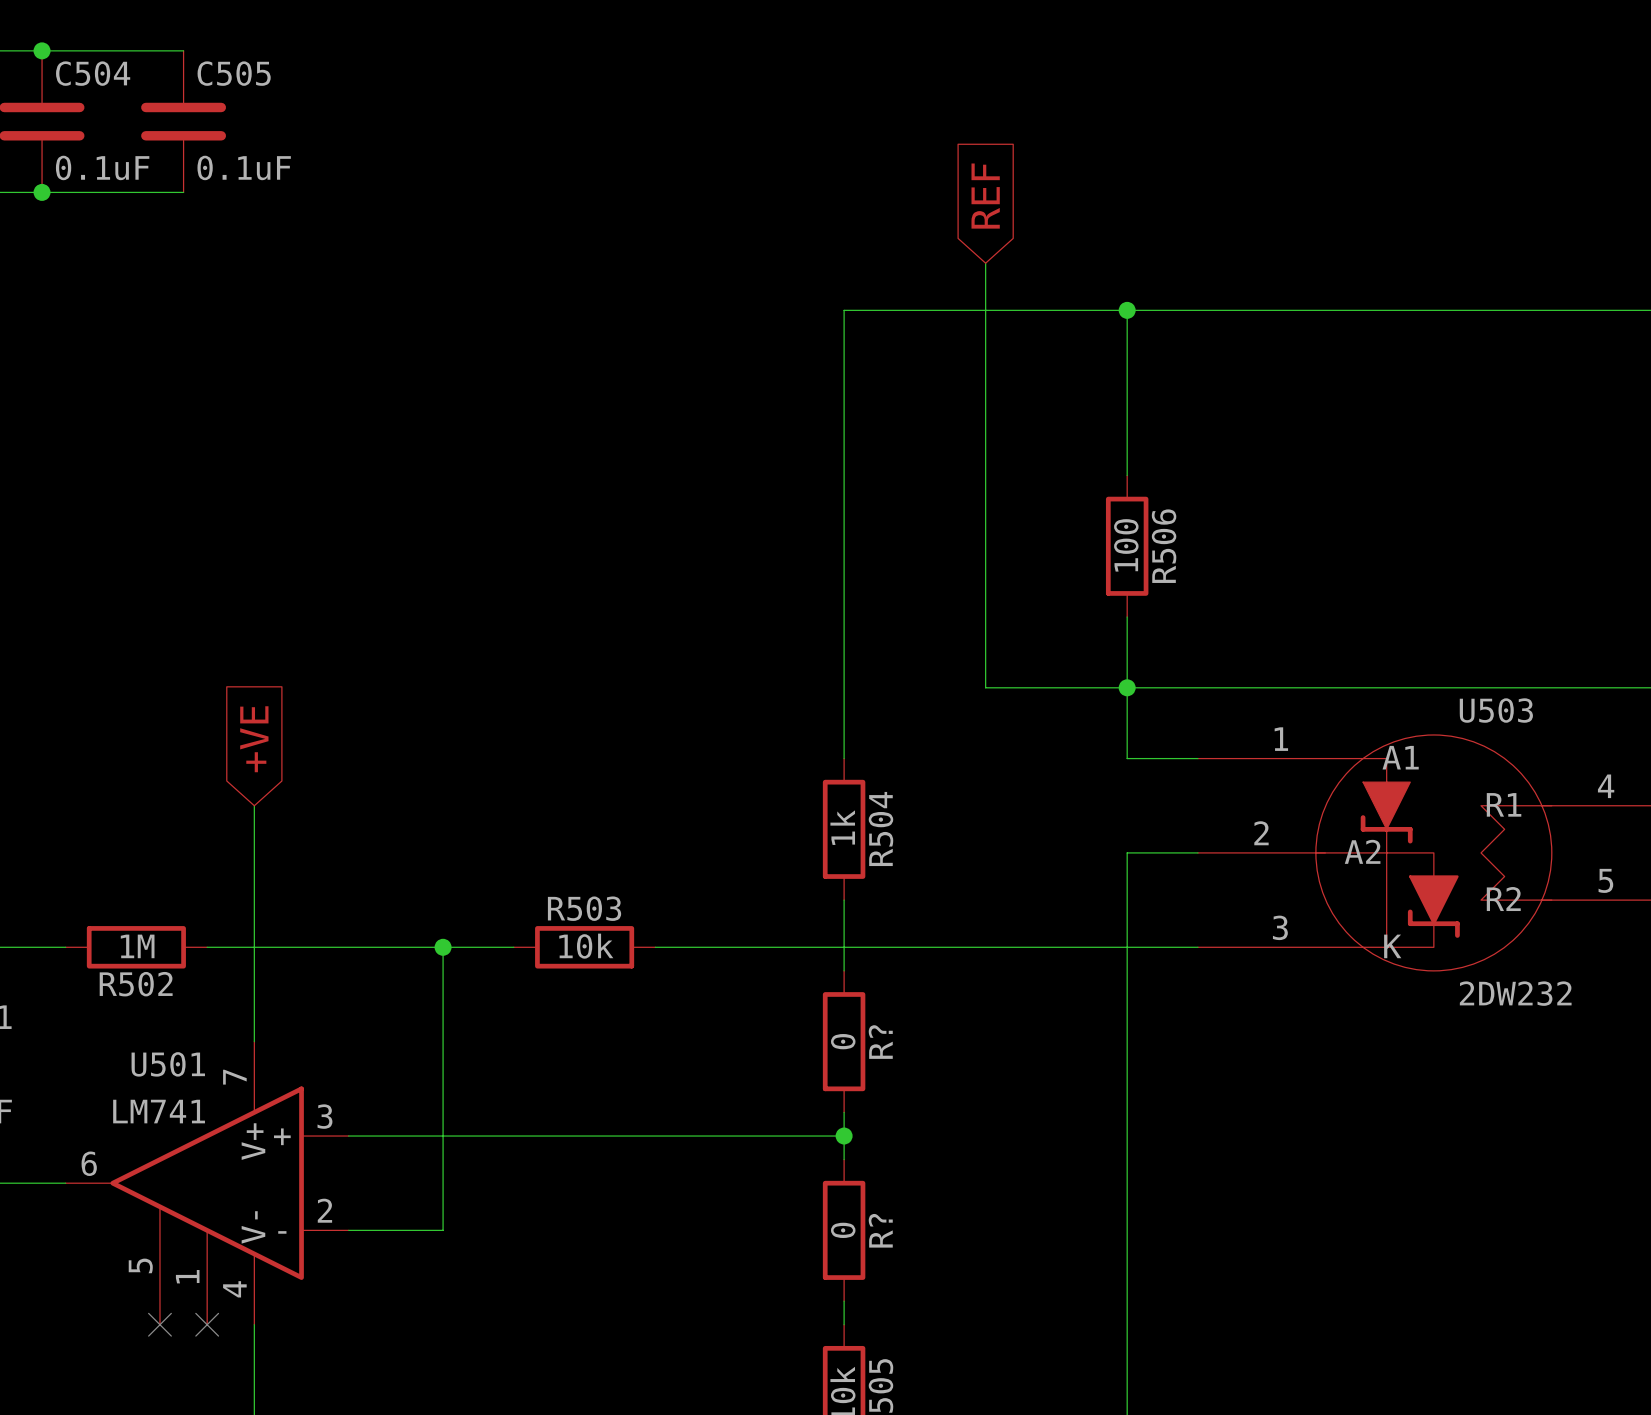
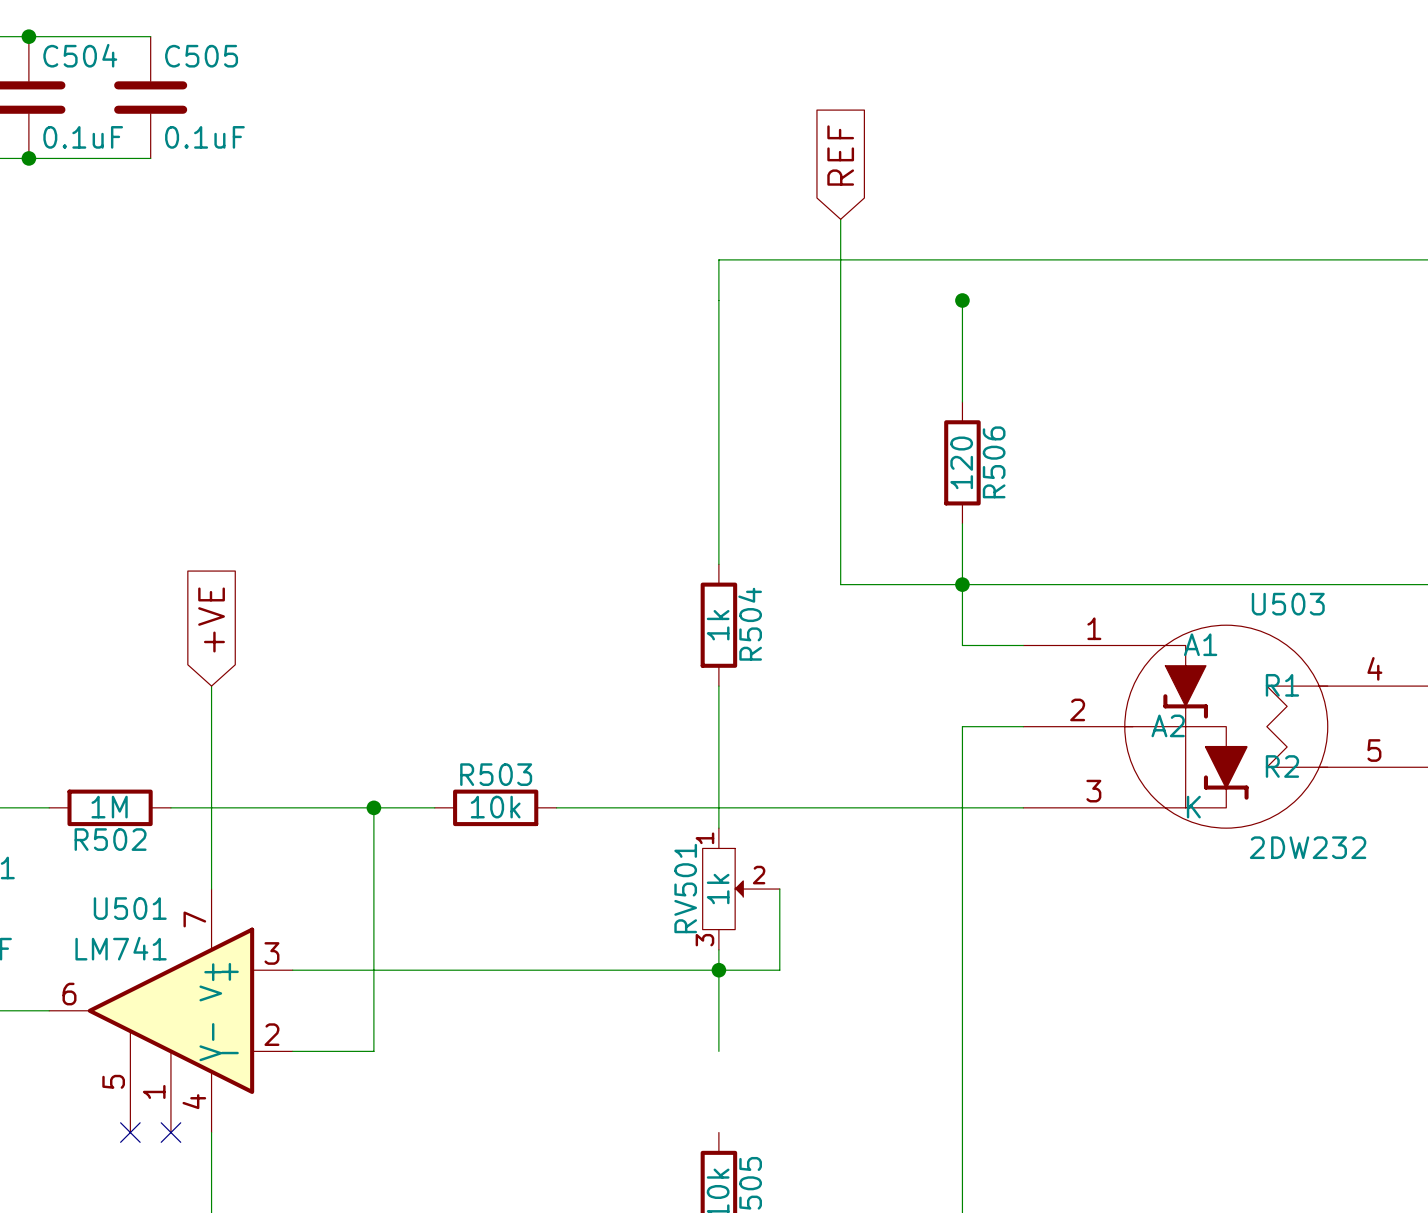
wire: (1127, 310) (1127, 357) -> none
junction position: (1127, 310) -> (962, 300)
R506 value: 100 (1126, 545) -> 120 (961, 462)
wire: (844, 664) (844, 758) -> (718, 686) (718, 767)
R504 position: (844, 829) -> (718, 625)
R?: 0 (844, 1041) -> none
RV501: none -> 1k (741, 889)
wire: none -> (779, 889) (779, 970) (718, 970)
wire: none -> (718, 990) (718, 1051)
R?: 0 (844, 1230) -> none
wire: (844, 1301) (844, 1324) -> none

